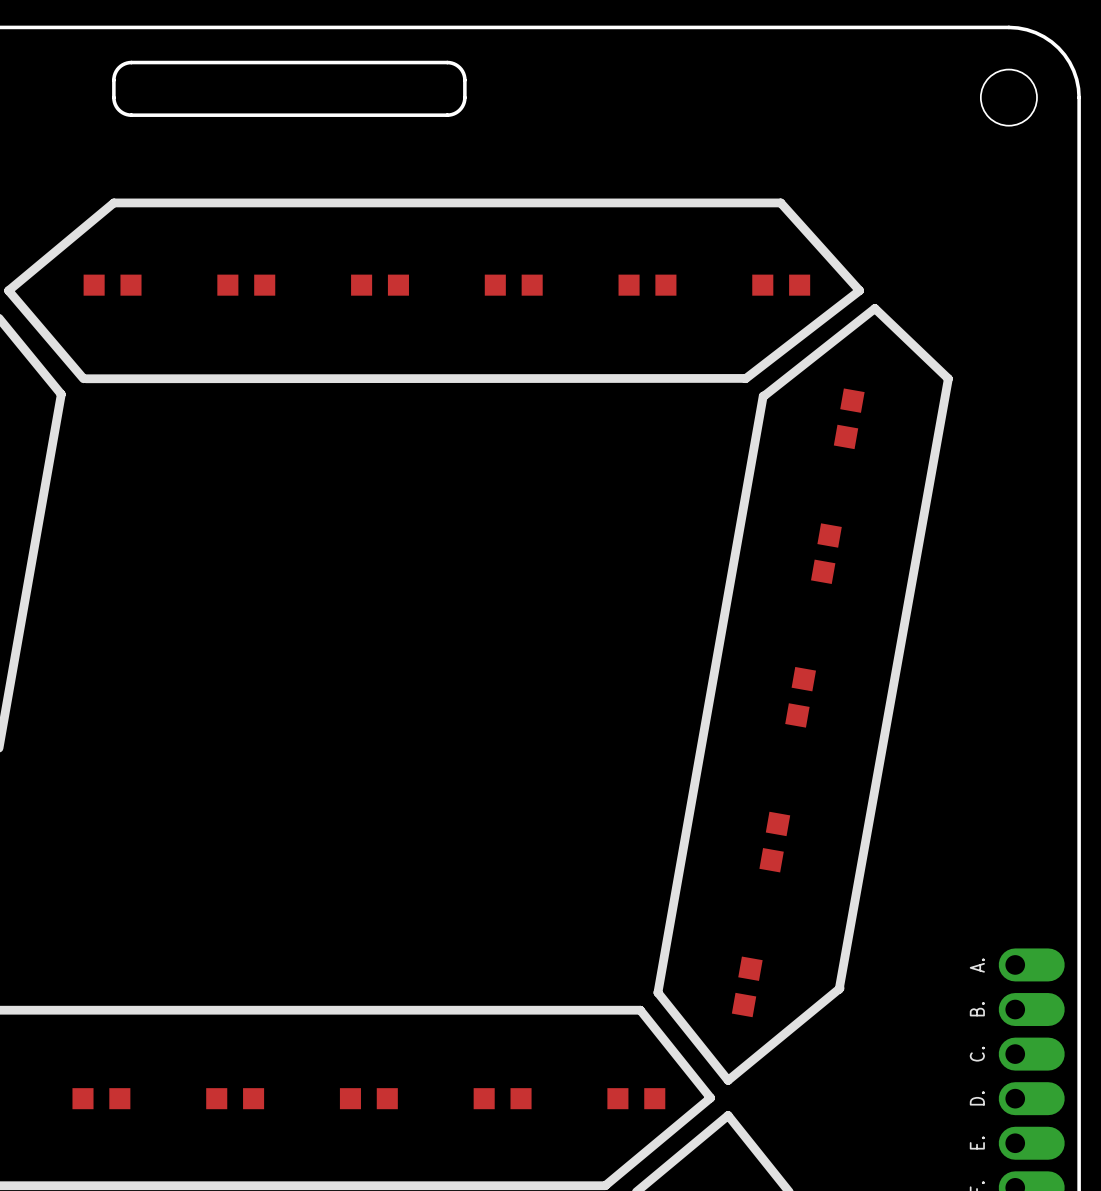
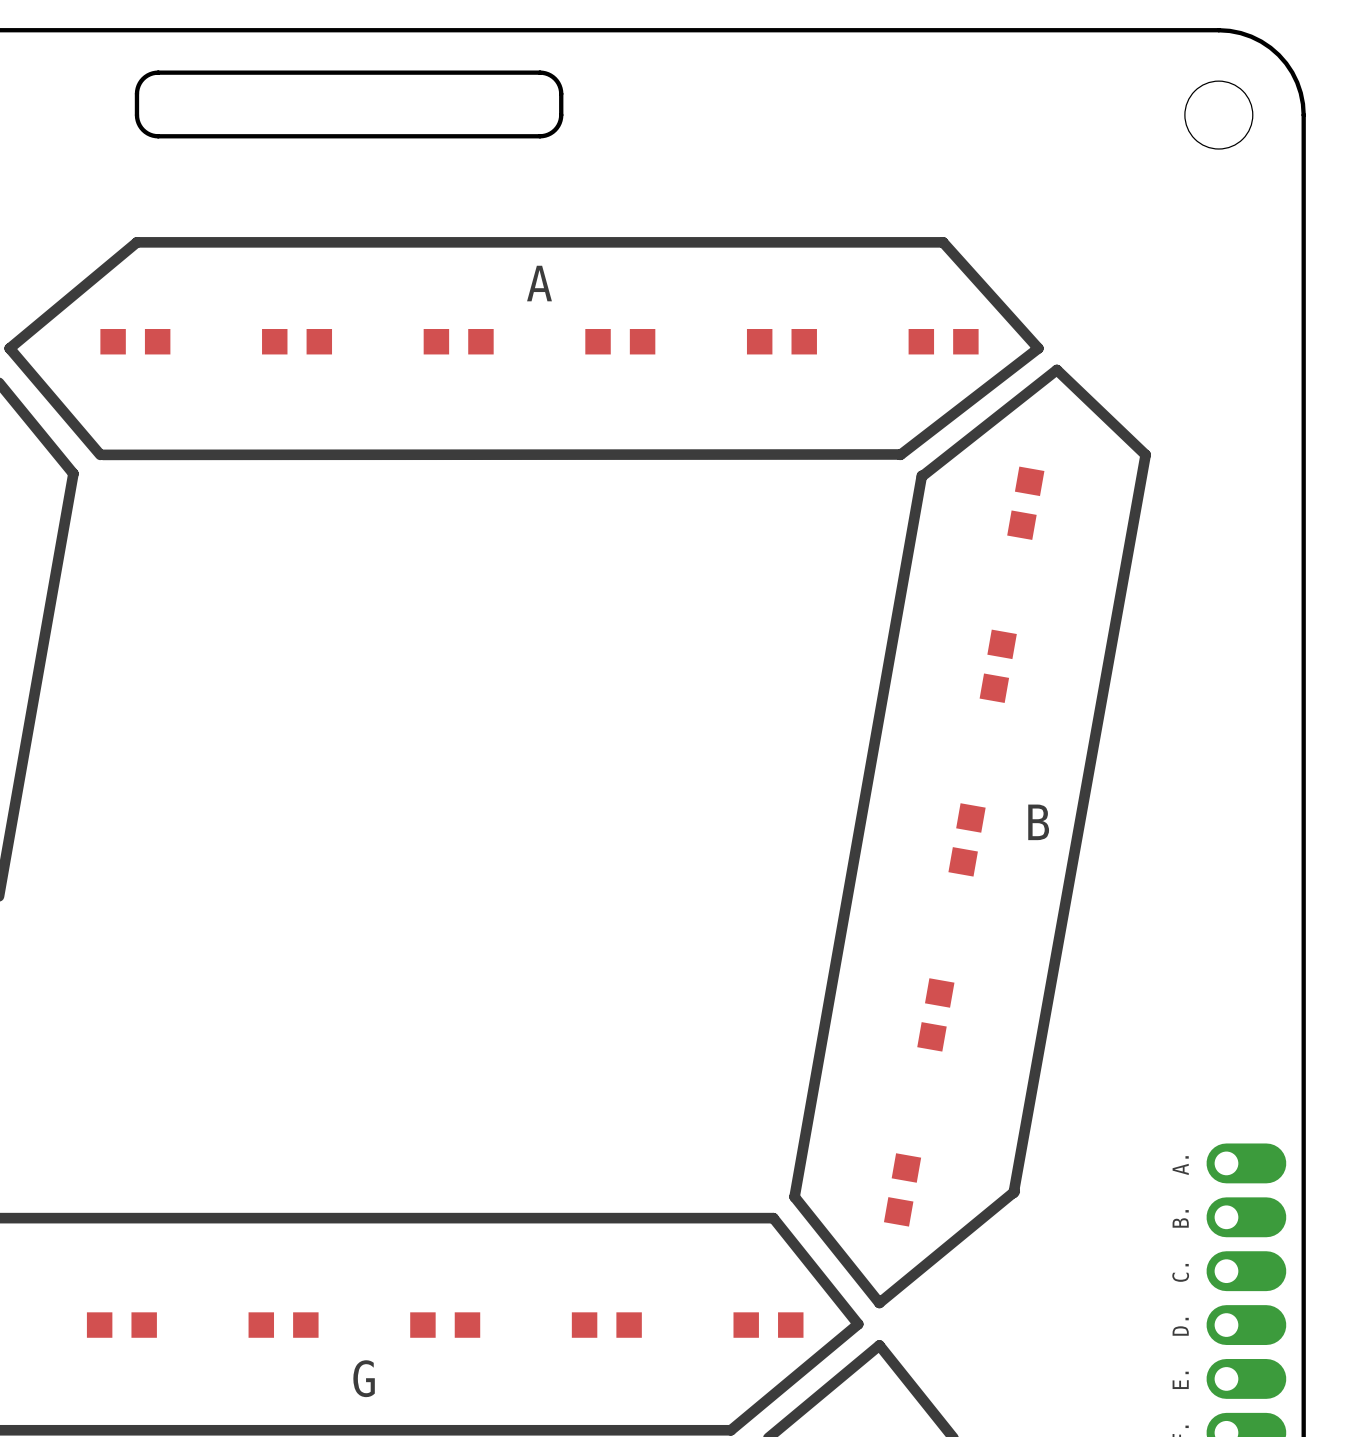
text: none -> A (539, 283)
text: none -> B (1038, 822)
text: none -> G (364, 1378)

